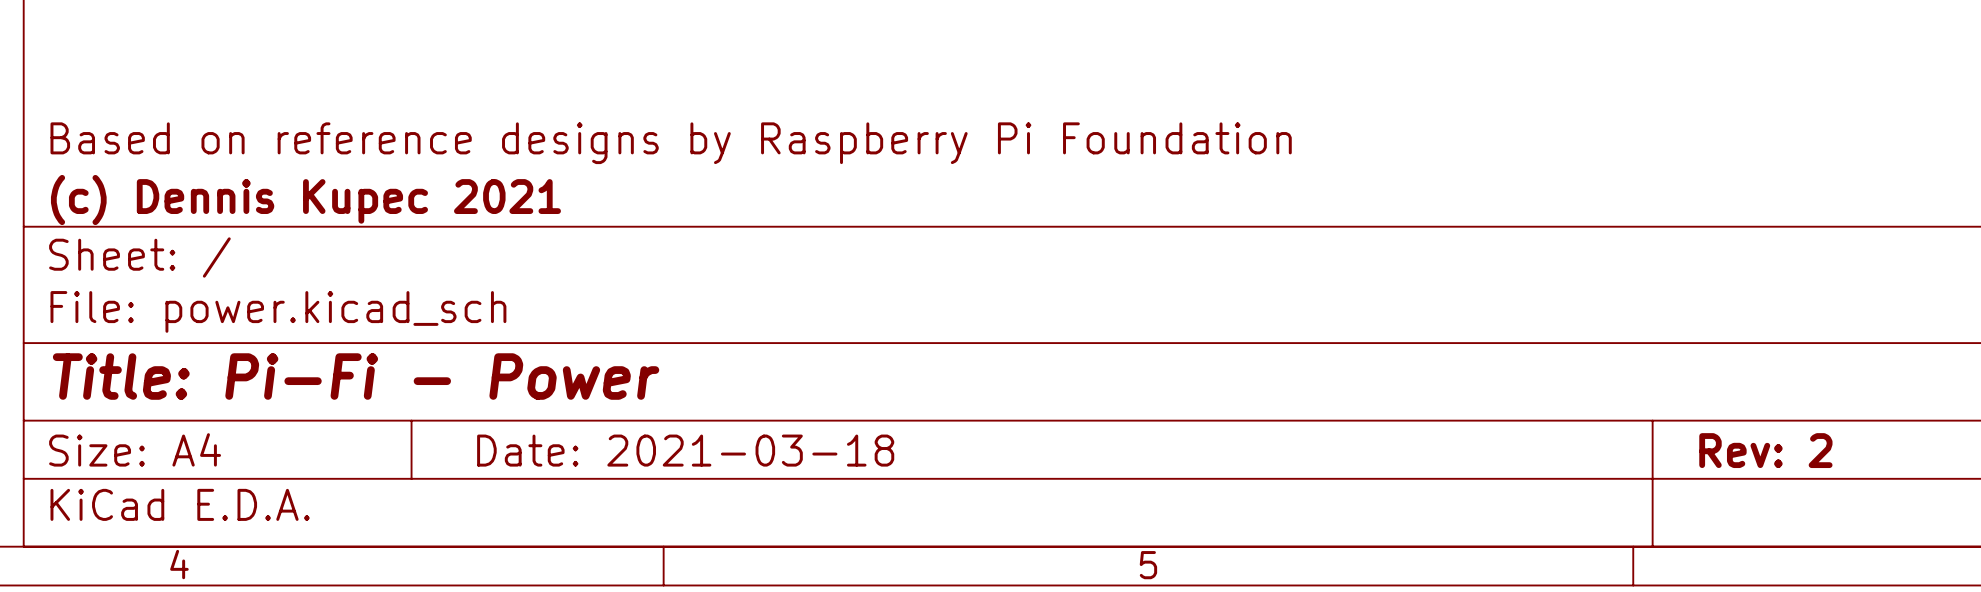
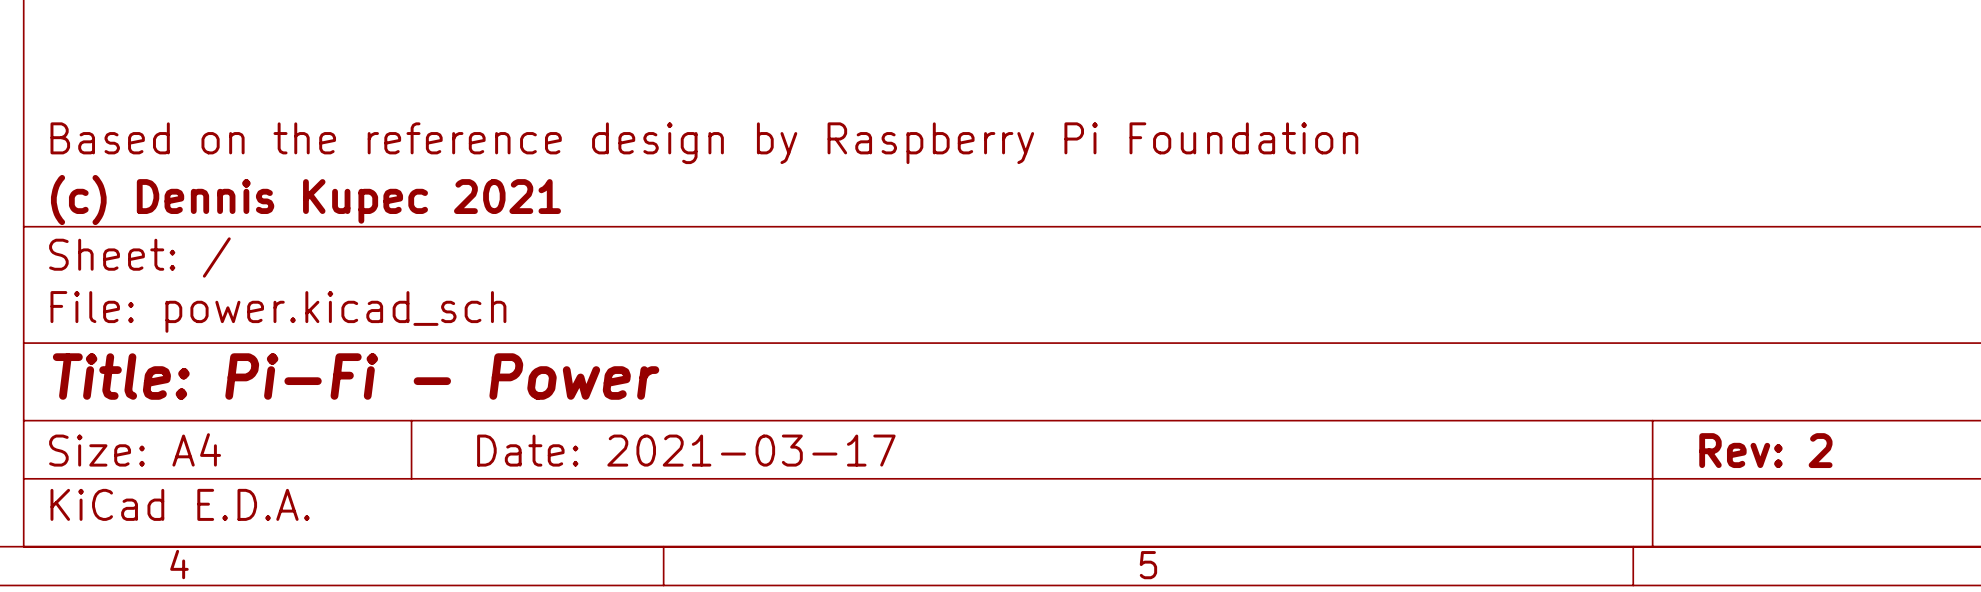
title block: Based on reference designs by Raspberry Pi Foundation (671, 143) -> Based on the reference design by Raspberry Pi Foundation (704, 143)
title block: Date: 2021-03-18 (685, 450) -> Date: 2021-03-17 (686, 450)

